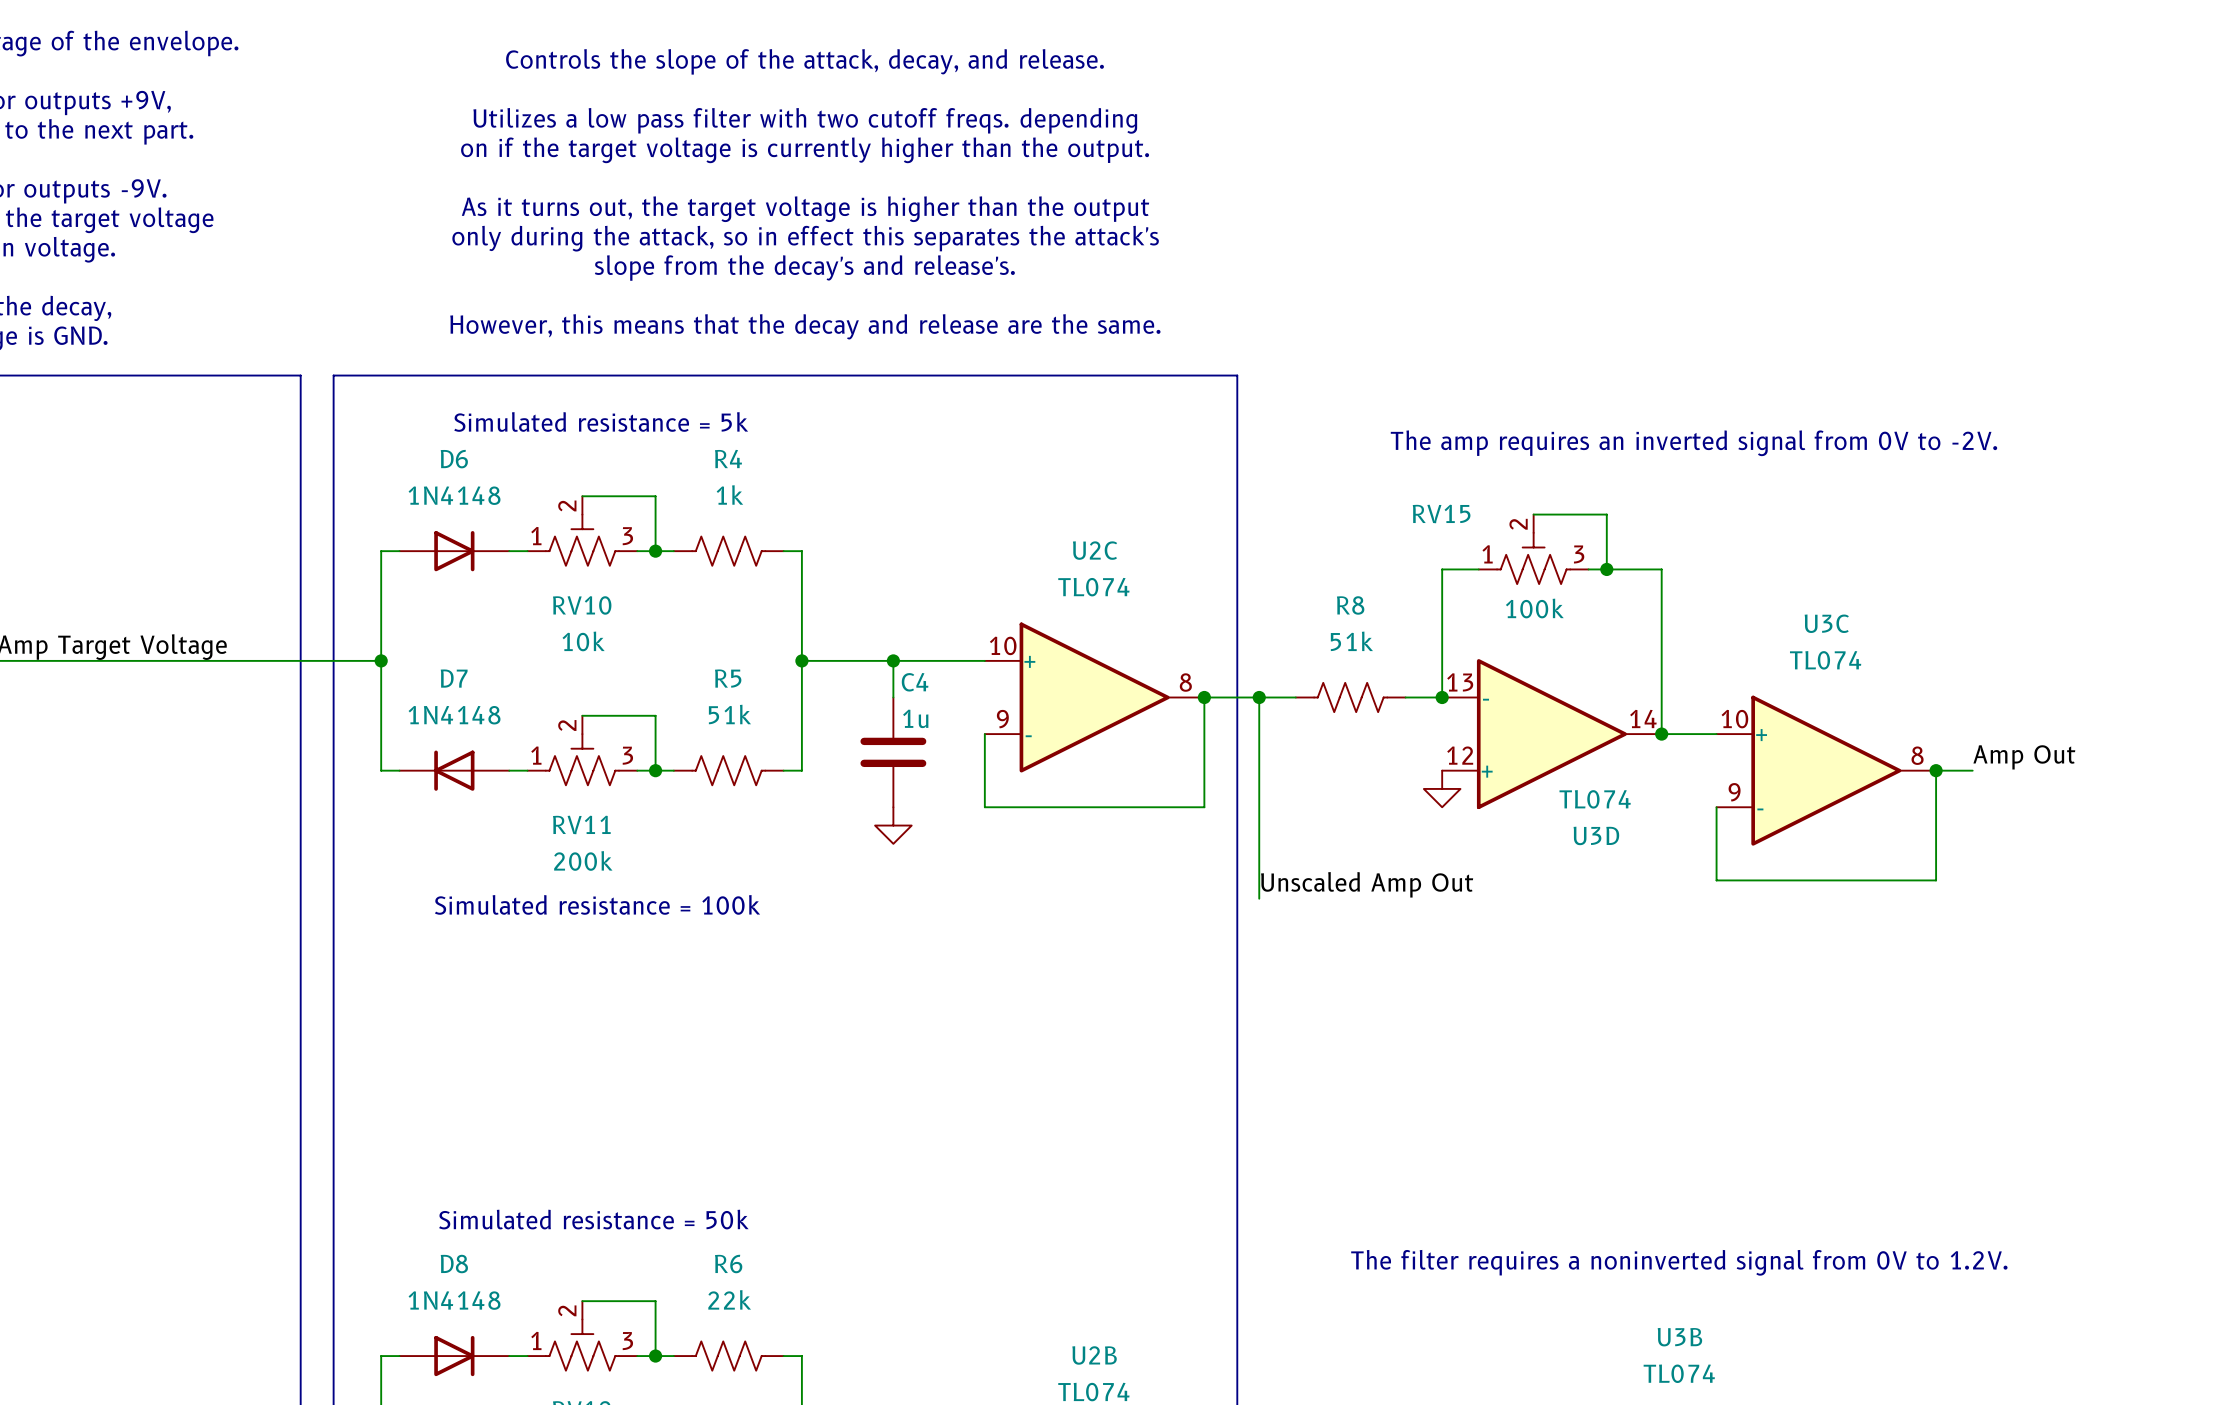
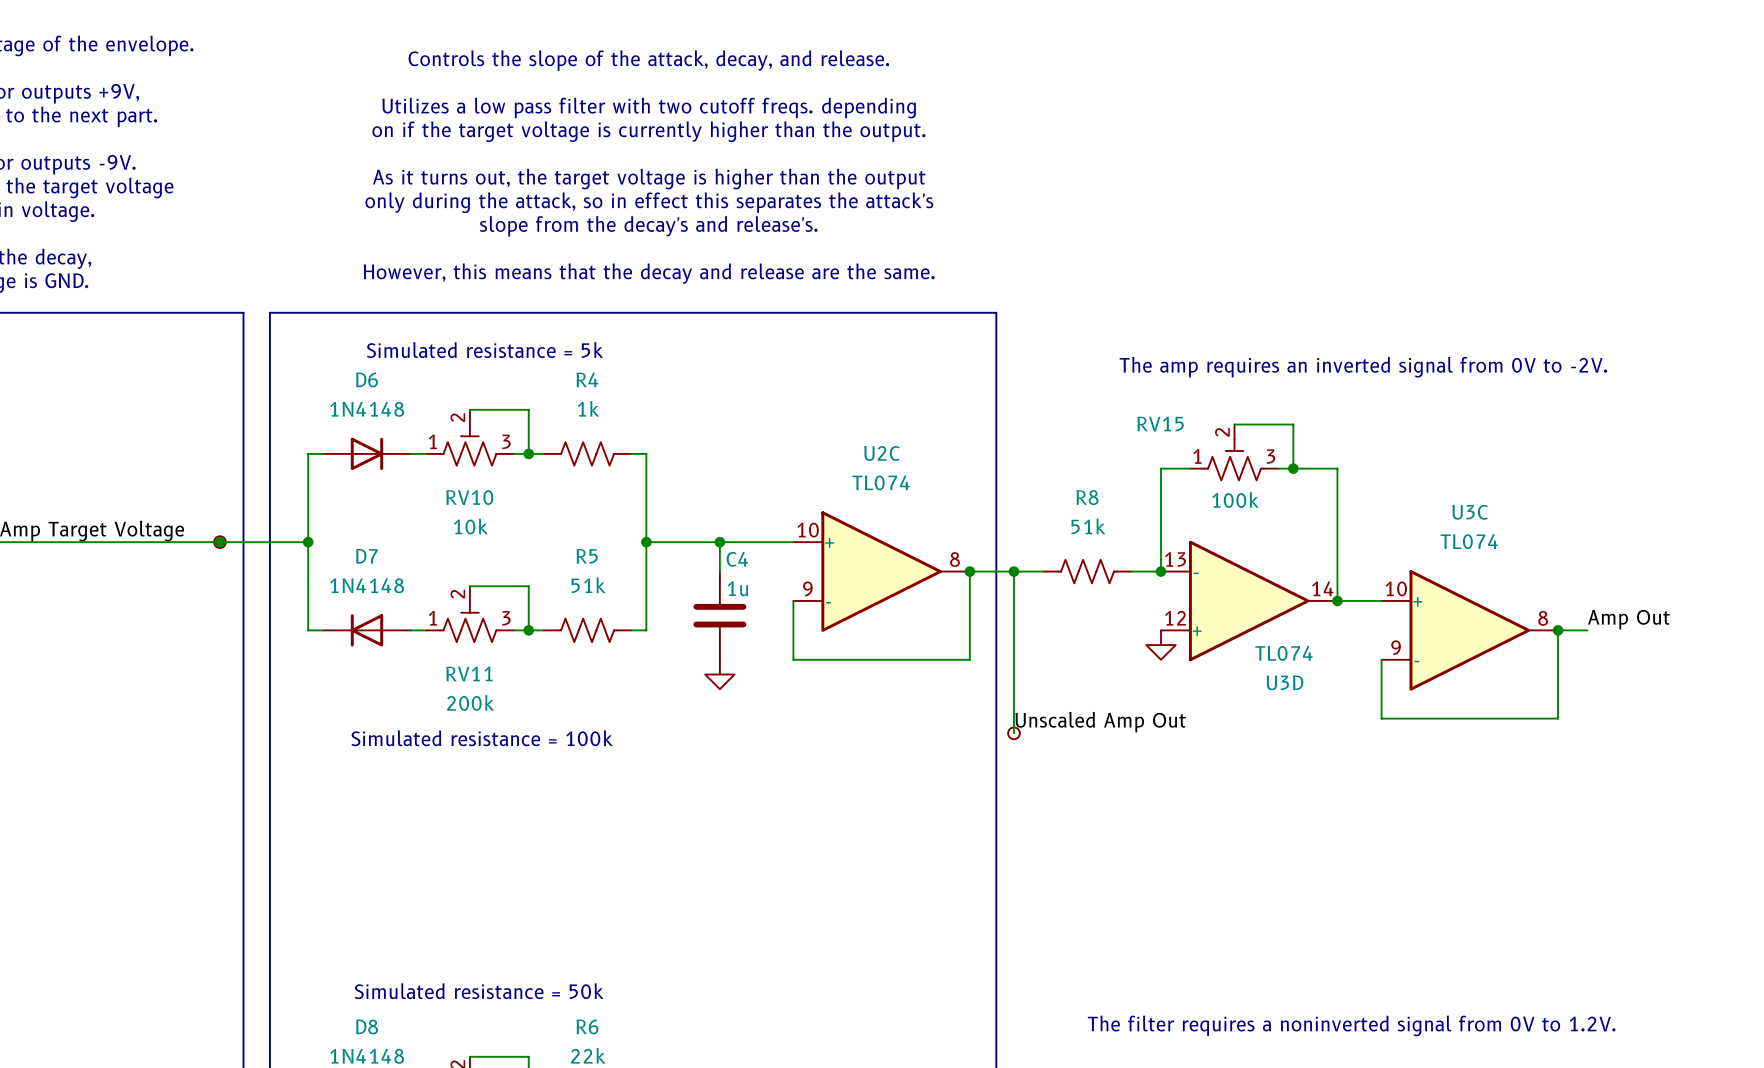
junction: none -> (219, 542)
part: none -> (219, 542)
part: none -> (1013, 733)

